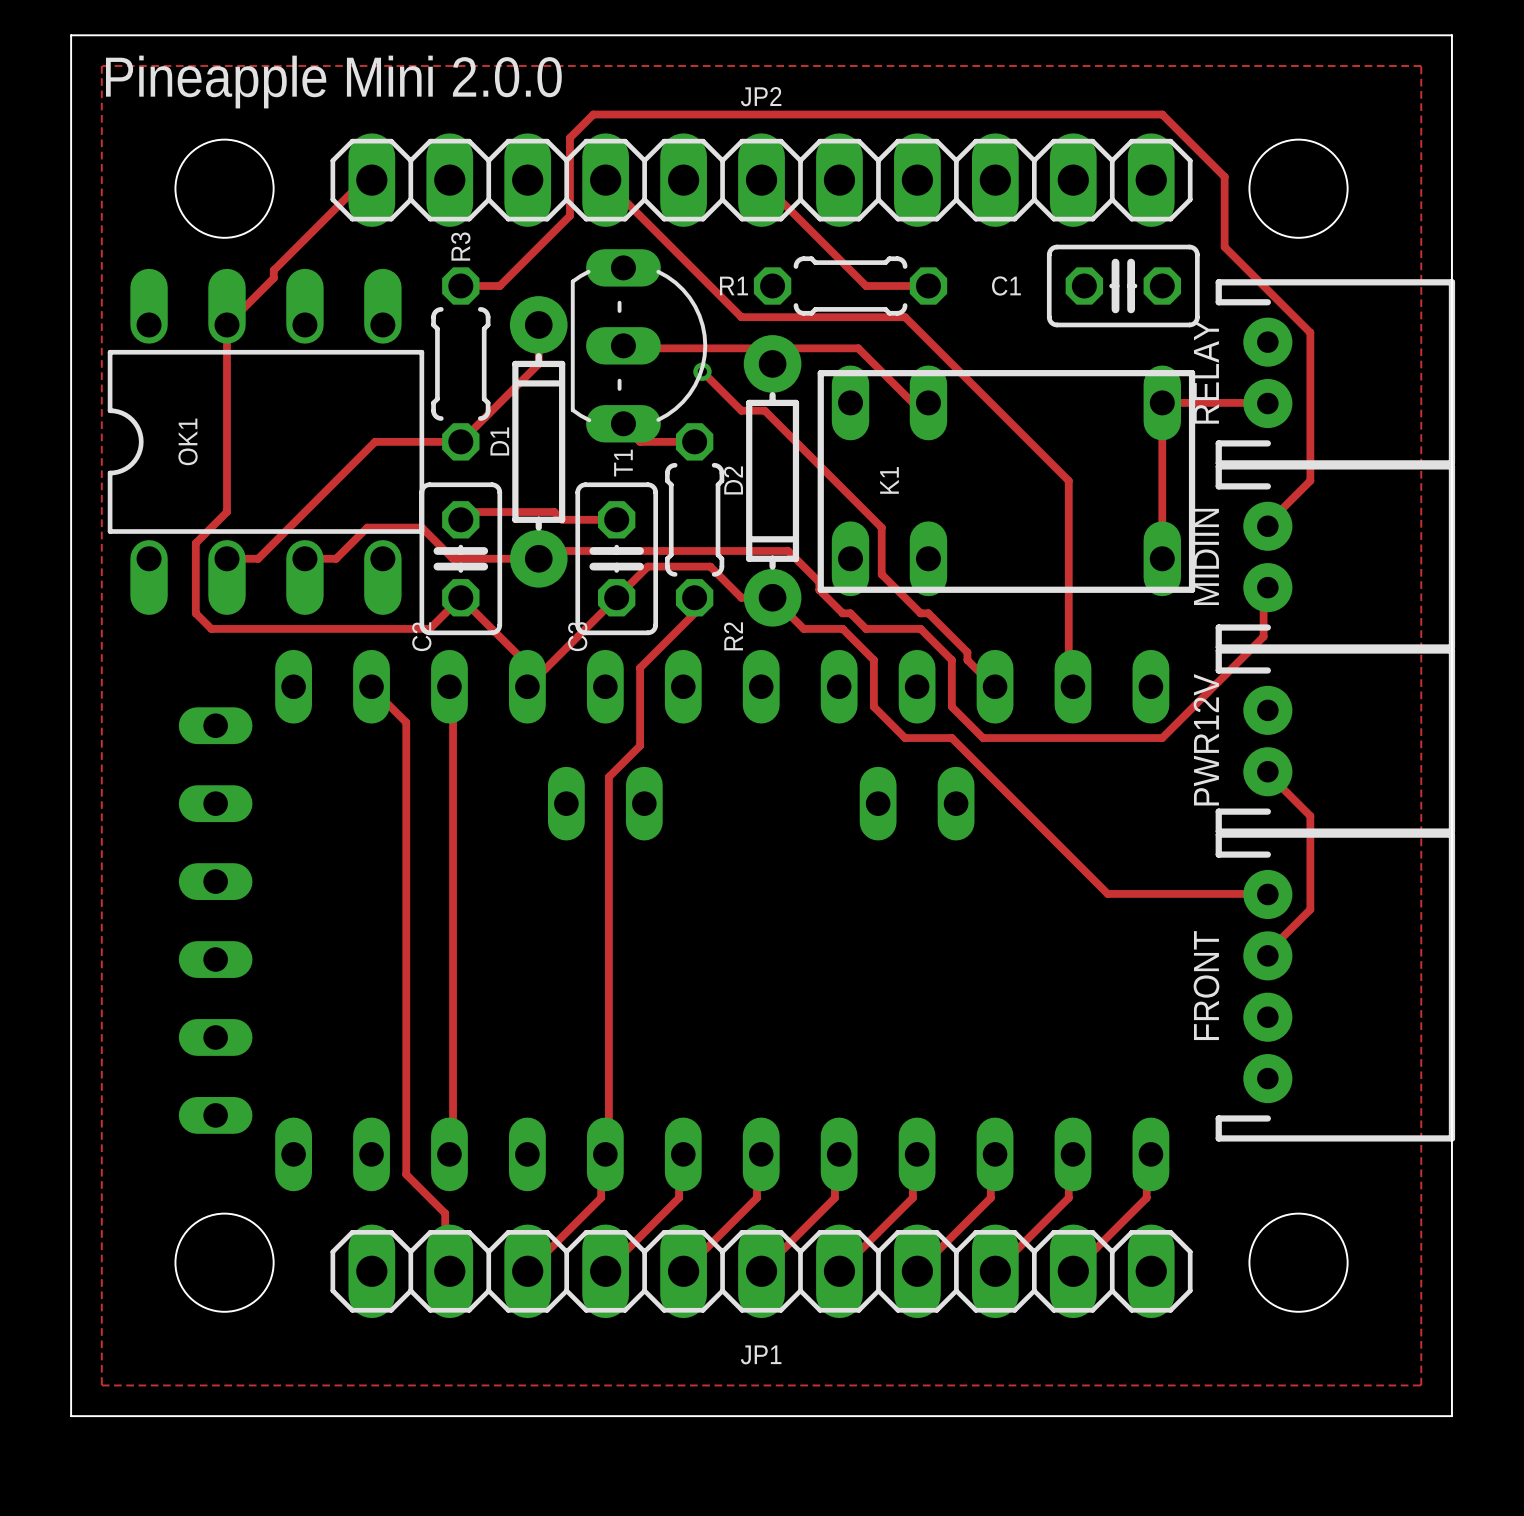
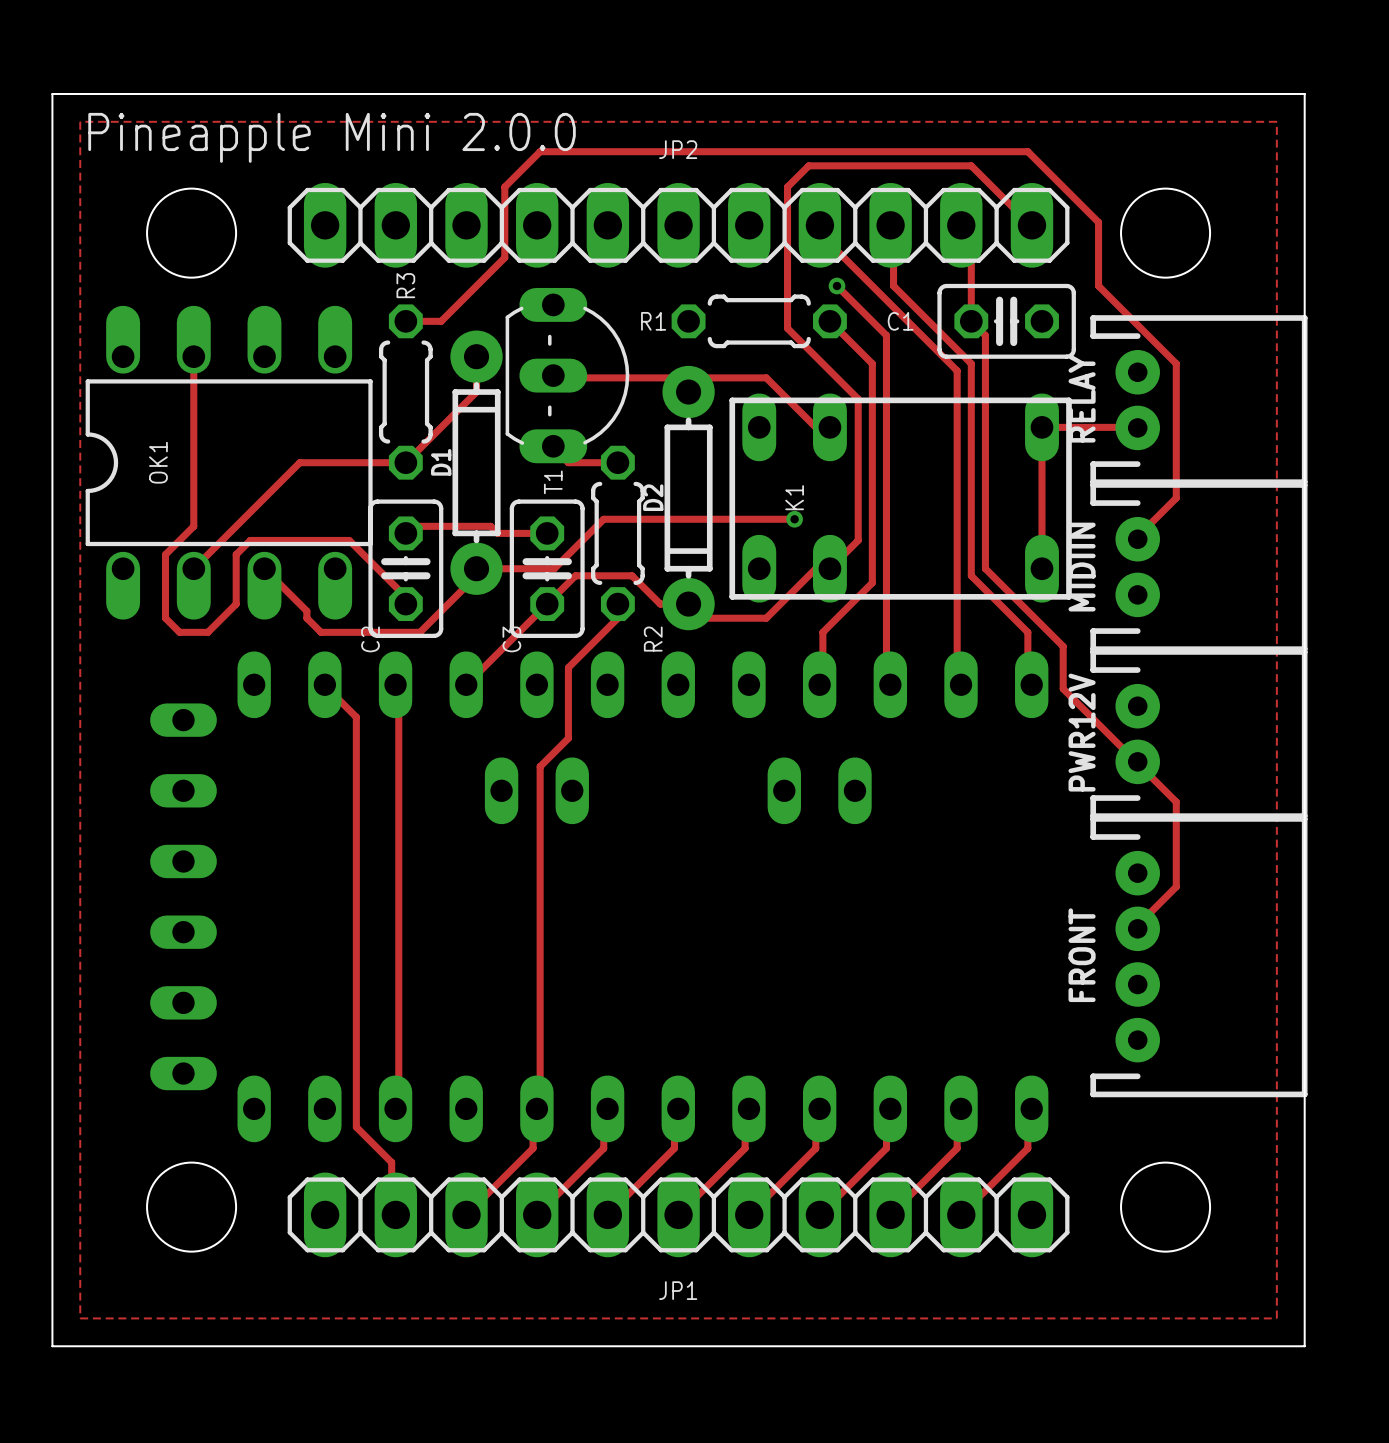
track: (593, 114) (905, 114) -> (526, 165) (540, 151) (1027, 151) (1041, 165)
track: (1084, 114) (1162, 114) -> (971, 165) (1031, 225)
track: (371, 180) (367, 176) (273, 270) (273, 278) (227, 324) -> none
track: (605, 180) (741, 317) (905, 317) -> (808, 165) (787, 187) (787, 328) (808, 349)
track: (761, 180) (866, 285) (928, 285) -> (819, 684) (822, 681) (822, 632) (872, 582) (872, 363) (829, 321)
track: none -> (890, 225) (893, 229) (893, 286) (971, 363) (971, 575) (1027, 632) (1027, 681) (1031, 684)
track: none -> (961, 225) (971, 236) (971, 321) (985, 335) (985, 568) (1063, 646) (1063, 688) (1137, 761)
via: none -> (837, 286)
track: (702, 371) (741, 410) (764, 410) (881, 527) (881, 574) (920, 613) (928, 613) (967, 652) (967, 660) (990, 683) -> (837, 286) (886, 335) (886, 681)
via: (702, 371) -> none
track: (959, 371) (1068, 480) -> (819, 225) (815, 229) (957, 370) (957, 498)
track: (375, 441) (289, 527) -> (328, 462) (299, 462) (193, 568)
via: none -> (794, 519)
track: (367, 527) (336, 558) (304, 558) -> (321, 540) (250, 540)
track: (398, 527) (421, 527) (453, 558) (538, 558) (546, 550) (788, 550) (819, 582) (819, 589) (842, 613) -> (349, 540) (405, 597) (405, 604)
track: (273, 543) (258, 558) (227, 558) -> (236, 554) (236, 604) (207, 632)
track: (1267, 587) (1263, 589) (1263, 636) (1162, 738) (983, 738) (951, 706) (951, 660) (920, 628) (866, 628) (850, 613) -> (858, 399) (858, 540) (829, 568) (815, 568) (766, 618) (759, 618)
track: (788, 613) (803, 628) (842, 628) (873, 660) (873, 706) (905, 738) (951, 738) (1107, 893) (1267, 894) -> (702, 618) (752, 618)
track: (242, 628) (367, 628) -> (264, 568) (306, 611) (306, 618) (321, 632)
track: (429, 628) (460, 597) (523, 660) (523, 683) (527, 686) -> (377, 632) (419, 632) (476, 575) (476, 568) (554, 568) (603, 519) (794, 519)

